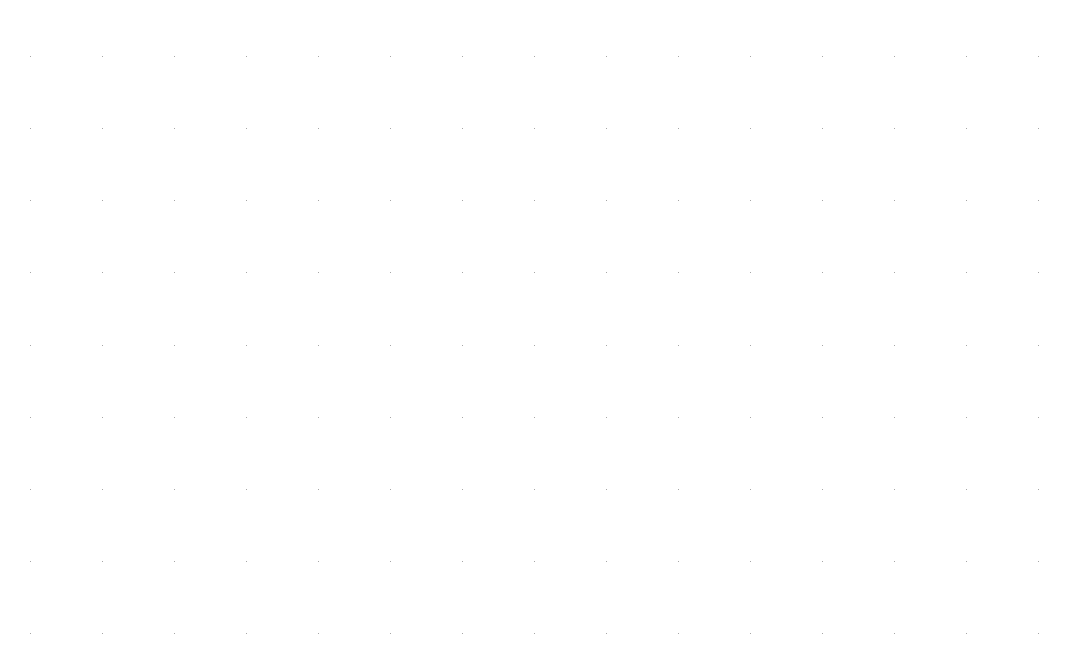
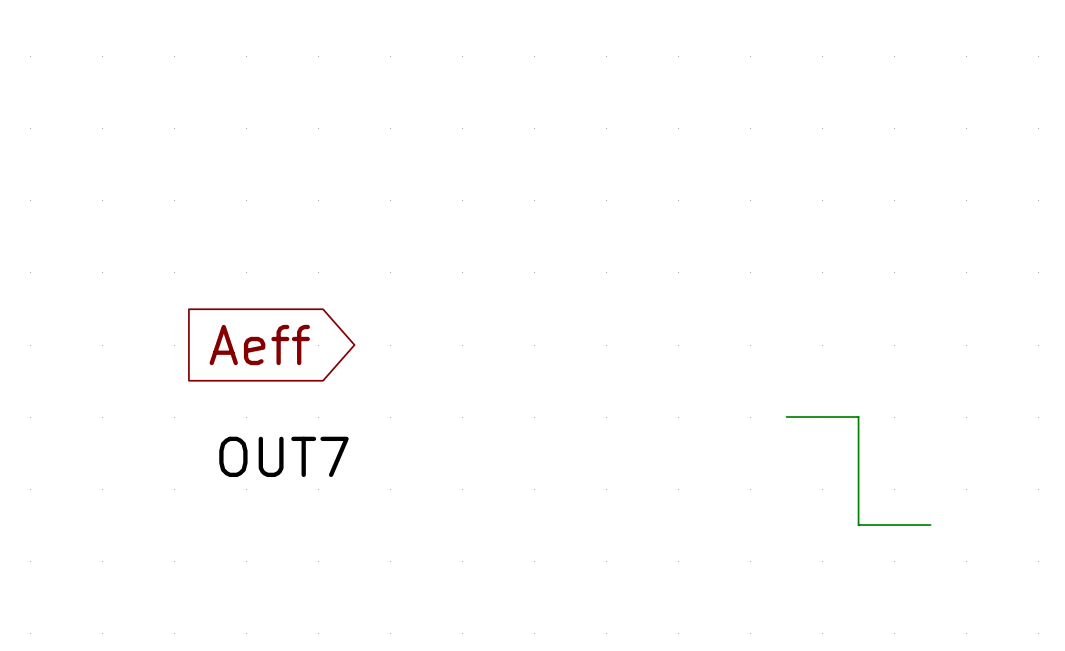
global label: none -> Aeff (259, 345)
wire: none -> (786, 417) (858, 417) (858, 525) (930, 525)
label: none -> OUT7 (283, 456)

